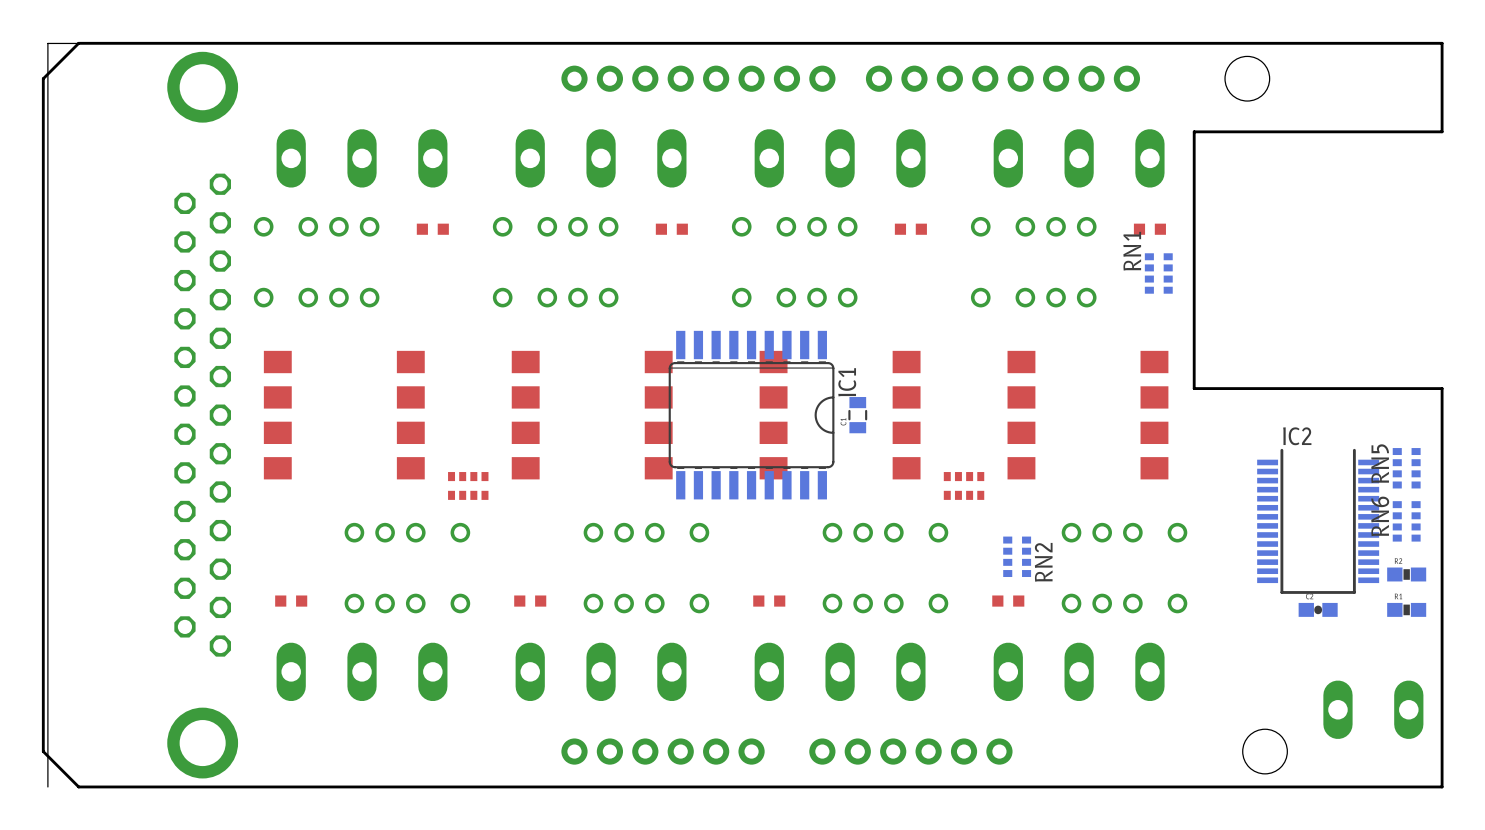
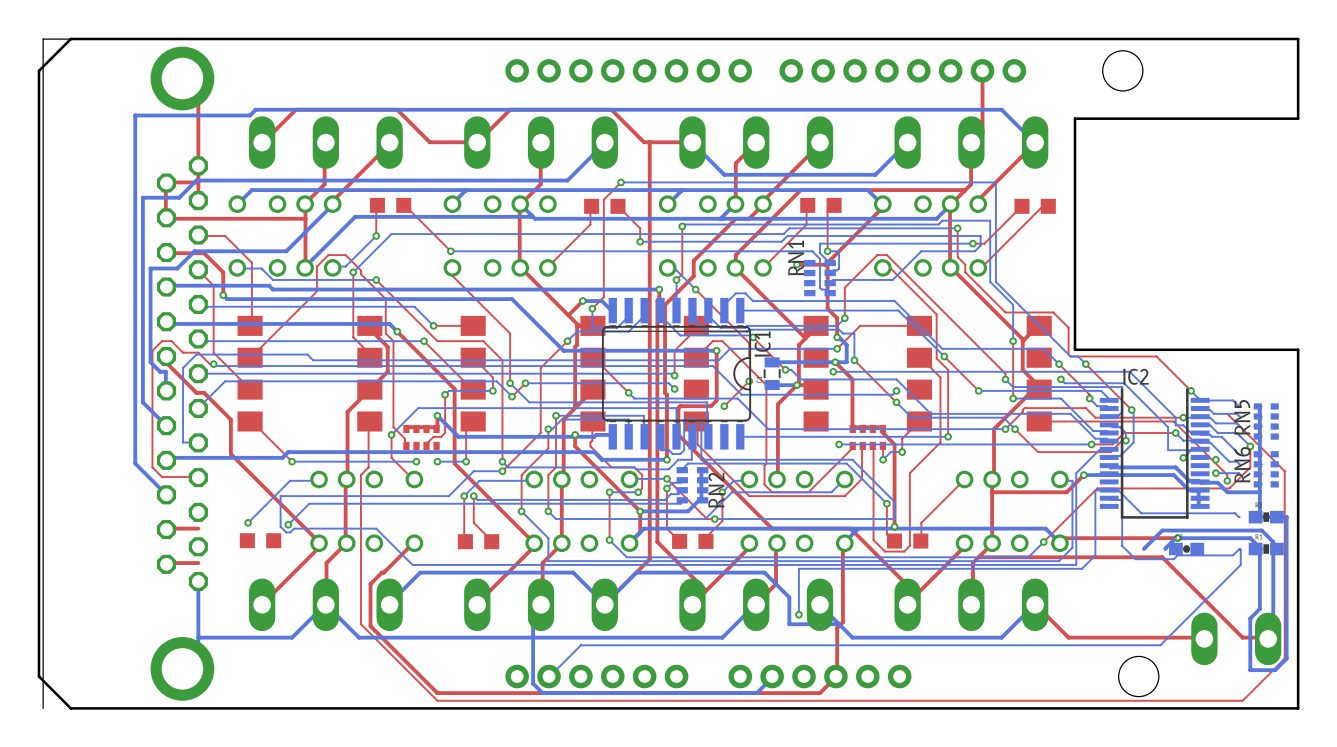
top track: none -> (982, 70) (982, 132) (971, 142) (971, 184) (950, 205) (950, 266) (1023, 340)
top track: none -> (182, 78) (198, 94) (198, 200)
top track: none -> (325, 142) (324, 184) (305, 204) (305, 267)
top track: none -> (389, 142) (334, 199) (332, 204)
top track: none -> (541, 142) (540, 184) (519, 205) (519, 266) (578, 325) (592, 325)
bottom track: none -> (604, 142) (567, 180) (196, 180) (179, 197) (142, 197) (142, 402) (166, 425)
top track: none -> (649, 142) (649, 559) (604, 604)
top track: none -> (692, 142) (644, 142) (611, 109) (510, 109) (477, 142) (429, 142) (397, 109) (295, 109) (262, 142)
top track: none -> (756, 142) (735, 163) (735, 204)
top track: none -> (819, 142) (764, 199) (764, 203) (749, 218) (735, 218) (693, 260) (693, 276) (665, 304) (666, 459)
bottom track: none -> (907, 142) (875, 174) (724, 174) (692, 142)
top track: none -> (1035, 142) (978, 199) (978, 204)
bottom track: none -> (1035, 142) (1001, 109) (255, 109) (250, 115) (135, 115) (135, 463) (166, 494)
top track: none -> (198, 182) (166, 183) (166, 217) (305, 218)
top track: none -> (621, 182) (603, 199) (603, 297) (592, 308)
bottom track: none -> (621, 182) (995, 182) (995, 281) (1070, 356) (1078, 356) (1085, 364)
via: none -> (621, 182)
bottom track: none -> (465, 191) (251, 190) (237, 204)
bottom track: none -> (681, 191) (466, 190) (452, 204)
top track: none -> (964, 191) (800, 190) (735, 255) (735, 267) (805, 338)
part footprint: [416, 223, 449, 235] -> [369, 197, 412, 213]
part footprint: [655, 223, 688, 235] -> [584, 198, 626, 214]
part footprint: [894, 223, 927, 235] -> [800, 197, 842, 213]
part footprint: [1133, 223, 1166, 235] -> [1014, 198, 1056, 214]
bottom track: none -> (332, 204) (286, 251) (194, 251) (177, 268) (150, 268) (150, 362) (160, 371) (165, 371) (166, 390)
bottom track: none -> (735, 204) (720, 218) (534, 218) (520, 204)
top track: none -> (882, 204) (881, 209) (825, 264) (797, 264)
bottom track: none -> (882, 204) (867, 190) (682, 190) (667, 204)
bottom track: none -> (950, 204) (936, 218) (721, 217)
top track: none -> (377, 205) (376, 235)
top track: none -> (403, 205) (450, 251)
top track: none -> (807, 205) (806, 224) (763, 267)
top track: none -> (834, 205) (827, 211) (827, 251)
top track: none -> (591, 206) (590, 224) (547, 267)
top track: none -> (617, 206) (640, 228) (640, 241)
top track: none -> (1021, 206) (984, 243) (972, 243)
top track: none -> (1048, 206) (1041, 207) (982, 266) (978, 267)
bottom track: none -> (532, 215) (355, 216) (305, 267)
top track: none -> (682, 226) (682, 274) (676, 279)
bottom track: none -> (682, 226) (684, 224) (938, 224) (942, 220) (990, 220) (990, 281) (1013, 304) (1013, 341)
via: none -> (682, 226)
top track: none -> (957, 228) (957, 257) (965, 264) (965, 272) (1005, 312) (1053, 312) (1068, 327) (1068, 354) (1070, 356) (1156, 356) (1191, 390)
bottom track: none -> (957, 228) (789, 228) (783, 234) (391, 234) (353, 272)
via: none -> (957, 228)
RN1 footprint: [1144, 253, 1173, 294] -> [804, 259, 836, 297]
top track: none -> (198, 235) (225, 235) (251, 262) (251, 325) (250, 325)
bottom track: none -> (376, 235) (345, 266) (332, 267)
via: none -> (376, 235)
bottom track: none -> (640, 241) (781, 241) (787, 235) (980, 235) (980, 245) (974, 251) (921, 251) (892, 279) (833, 279) (830, 283)
via: none -> (640, 241)
bottom track: none -> (972, 243) (819, 243) (819, 253) (830, 263)
via: none -> (972, 243)
bottom track: none -> (450, 251) (812, 251) (819, 258) (819, 287) (827, 289) (830, 293)
via: none -> (450, 251)
bottom track: none -> (827, 251) (839, 251) (839, 268) (830, 273)
via: none -> (827, 251)
top track: none -> (166, 252) (204, 253) (223, 272) (223, 295)
top track: none -> (826, 263) (827, 308) (837, 318) (837, 337)
via: none -> (797, 264)
bottom track: none -> (237, 267) (261, 268) (272, 279) (376, 279)
top track: none -> (452, 267) (452, 276) (510, 333) (510, 383)
bottom track: none -> (667, 267) (674, 268) (695, 289)
top track: none -> (882, 267) (890, 268) (936, 314) (936, 358) (948, 369) (948, 436)
top track: none -> (198, 269) (213, 285) (213, 352) (250, 389)
top track: none -> (353, 272) (353, 337) (368, 352) (369, 357)
via: none -> (353, 272)
top track: none -> (376, 279) (437, 341) (483, 341) (502, 360) (502, 461)
via: none -> (376, 279)
bottom track: none -> (676, 279) (676, 310)
via: none -> (676, 279)
bottom track: none -> (166, 286) (269, 285) (272, 289) (659, 289)
top track: none -> (659, 289) (659, 299) (657, 301) (657, 542) (705, 589) (692, 604) (749, 547) (749, 543)
via: none -> (659, 289)
top track: none -> (695, 289) (749, 343) (749, 358)
via: none -> (695, 289)
bottom track: none -> (223, 295) (227, 299) (512, 299) (563, 350) (716, 350)
via: none -> (223, 295)
top track: none -> (582, 301) (568, 315)
bottom track: none -> (582, 301) (601, 301) (612, 310)
via: none -> (582, 301)
bottom track: none -> (198, 304) (200, 306) (414, 306) (433, 325)
bottom track: none -> (592, 308) (592, 327) (617, 327) (628, 316) (628, 310)
via: none -> (592, 308)
bottom track: none -> (644, 310) (644, 316) (628, 331) (577, 331) (567, 341)
bottom track: none -> (660, 310) (661, 316) (680, 335) (751, 335) (753, 337)
bottom track: none -> (692, 310) (693, 318) (707, 331) (839, 329) (842, 333) (854, 333) (854, 360)
bottom track: none -> (708, 310) (709, 316) (720, 327) (837, 325) (844, 318)
bottom track: none -> (724, 310) (724, 304) (735, 293) (745, 293) (753, 301) (894, 301) (942, 348) (1043, 348) (1059, 364)
bottom track: none -> (740, 310) (898, 310) (944, 356)
top track: none -> (844, 318) (844, 287) (877, 255) (886, 255) (1005, 373) (1005, 379)
via: none -> (844, 318)
bottom track: none -> (166, 321) (169, 323) (389, 323) (397, 331)
top track: none -> (578, 324) (577, 345) (575, 346) (576, 407)
top track: none -> (369, 325) (370, 329) (387, 346) (387, 371) (347, 411) (346, 543) (326, 563) (325, 604)
via: none -> (433, 325)
top track: none -> (473, 325) (433, 325)
top track: none -> (696, 325) (695, 329) (674, 350) (674, 375)
top track: none -> (816, 325) (798, 345) (798, 385)
top track: none -> (919, 325) (860, 325) (837, 348)
top track: none -> (1039, 325) (1022, 341) (1022, 369) (1038, 385)
top track: none -> (397, 331) (454, 388) (454, 463) (534, 543) (533, 547) (477, 604)
via: none -> (397, 331)
top track: none -> (753, 337) (785, 369)
via: none -> (753, 337)
bottom track: none -> (837, 337) (846, 345) (846, 362) (772, 362)
via: none -> (837, 337)
bottom track: none -> (198, 338) (200, 341) (424, 341)
top track: none -> (424, 341) (473, 389)
via: none -> (424, 341)
top track: none -> (567, 341) (540, 367) (540, 432) (502, 471)
via: none -> (567, 341)
top track: none -> (1013, 341) (1013, 398)
via: none -> (1013, 341)
bottom track: none -> (837, 348) (730, 348) (718, 360) (313, 360) (307, 354) (196, 354) (183, 367) (183, 442) (198, 442)
via: none -> (837, 348)
top track: none -> (716, 350) (716, 400) (710, 406) (680, 406) (678, 408) (678, 434) (772, 528) (850, 528) (915, 593) (907, 604) (963, 547) (964, 543)
via: none -> (716, 350)
top track: none -> (166, 356) (167, 364) (196, 392) (204, 392) (230, 419) (230, 454) (318, 542) (318, 547) (262, 604)
top track: none -> (944, 356) (978, 390)
via: none -> (944, 356)
top track: none -> (250, 357) (316, 291) (316, 266) (328, 255) (345, 255) (360, 270) (360, 274) (385, 299) (385, 333) (393, 341) (393, 427) (404, 438) (406, 447)
top track: none -> (473, 357) (492, 377) (492, 390)
top track: none -> (592, 357) (628, 392)
top track: none -> (696, 357) (712, 341) (722, 341) (766, 385) (766, 463) (764, 465) (764, 484) (772, 492) (808, 492) (852, 447)
top track: none -> (919, 357) (940, 377) (940, 442) (909, 473) (909, 545) (904, 551) (885, 551) (873, 540) (872, 447)
top track: none -> (854, 360) (896, 402)
via: none -> (854, 360)
top track: none -> (835, 362) (852, 379) (852, 427) (883, 427) (883, 432) (894, 444) (894, 526)
via: none -> (835, 362)
top track: none -> (213, 364) (209, 364) (198, 352) (183, 352) (171, 341) (162, 341) (152, 350) (152, 467) (162, 476) (198, 477)
bottom track: none -> (213, 364) (215, 366) (712, 366) (741, 394) (892, 394) (896, 390)
via: none -> (213, 364)
top track: none -> (1059, 364) (1089, 394) (1089, 398)
via: none -> (1059, 364)
top track: none -> (1085, 364) (1131, 410)
via: none -> (1085, 364)
bottom track: none -> (785, 369) (791, 369) (800, 379) (896, 379) (930, 413) (1070, 413) (1095, 438) (1106, 438) (1109, 441)
via: none -> (785, 369)
bottom track: none -> (833, 371) (1129, 371) (1175, 417) (1175, 425) (1183, 425) (1191, 432) (1221, 436) (1240, 454)
via: none -> (833, 371)
bottom track: none -> (198, 373) (672, 373) (674, 375)
via: none -> (674, 375)
bottom track: none -> (1005, 379) (1013, 387) (1122, 387) (1122, 411) (1118, 415) (1109, 416)
via: none -> (1005, 379)
bottom track: none -> (1060, 379) (1064, 383) (1124, 383) (1168, 427) (1168, 450) (1200, 449) (1191, 450) (1183, 457)
via: none -> (1060, 379)
top track: none -> (749, 381) (724, 406)
via: none -> (749, 381)
bottom track: none -> (510, 383) (529, 402) (707, 402) (708, 436)
via: none -> (510, 383)
top track: none -> (525, 383) (512, 396)
bottom track: none -> (525, 383) (668, 383) (674, 388)
via: none -> (525, 383)
bottom track: none -> (797, 385) (772, 385)
via: none -> (797, 385)
top track: none -> (1038, 385) (994, 429) (992, 543) (972, 563) (972, 603) (971, 604)
top track: none -> (592, 389) (563, 419) (561, 543) (542, 563) (542, 603) (541, 604)
via: none -> (674, 388)
top track: none -> (816, 389) (810, 385) (797, 385) (777, 404) (776, 479)
bottom track: none -> (492, 390) (448, 390) (445, 394)
via: none -> (492, 390)
via: none -> (896, 390)
bottom track: none -> (978, 390) (1101, 390) (1109, 400)
via: none -> (978, 390)
bottom track: none -> (1191, 390) (1200, 400) (1233, 400) (1240, 406)
via: none -> (1191, 390)
bottom track: none -> (628, 392) (634, 398) (737, 398) (768, 429) (1005, 429)
via: none -> (628, 392)
top track: none -> (445, 394) (445, 432) (441, 436) (433, 436) (427, 442) (426, 447)
via: none -> (445, 394)
bottom track: none -> (512, 396) (496, 381) (225, 381) (198, 408)
via: none -> (512, 396)
bottom track: none -> (1013, 398) (1060, 398) (1093, 431) (1106, 431) (1109, 432)
via: none -> (1013, 398)
bottom track: none -> (1089, 398) (1097, 406) (1106, 406) (1109, 408)
via: none -> (1089, 398)
bottom track: none -> (896, 402) (911, 417) (1003, 417) (1015, 429)
via: none -> (896, 402)
via: none -> (724, 406)
bottom track: none -> (1260, 406) (1259, 517) (1286, 517) (1286, 658) (1275, 670) (1250, 670) (1250, 618) (1259, 608) (1260, 549) (1250, 538) (1175, 538) (1165, 549)
bottom track: none -> (1200, 408) (1210, 410) (1213, 413) (1236, 413) (1240, 416)
bottom track: none -> (1131, 410) (1133, 410) (1133, 442) (1120, 455) (1109, 457)
via: none -> (1131, 410)
top track: none -> (1227, 413) (1284, 471) (1284, 658) (1242, 700) (437, 700) (360, 624) (360, 475) (368, 467) (369, 421)
top track: none -> (437, 415) (437, 427) (406, 427)
bottom track: none -> (437, 415) (458, 436) (594, 436) (596, 434) (609, 434) (612, 436)
via: none -> (437, 415)
top track: none -> (556, 415) (556, 467) (548, 475) (548, 511)
bottom track: none -> (556, 415) (644, 415) (644, 436)
via: none -> (556, 415)
top track: none -> (1183, 417) (1095, 417) (1085, 408) (1024, 408) (1005, 429)
bottom track: none -> (1183, 417) (1210, 417) (1215, 423) (1236, 423) (1240, 426)
via: none -> (1183, 417)
top track: none -> (250, 421) (292, 461)
top track: none -> (473, 421) (466, 427) (466, 461)
top track: none -> (592, 421) (590, 446) (611, 467) (634, 467) (642, 475) (642, 488) (638, 492)
top track: none -> (696, 421) (697, 444) (749, 496) (844, 496) (862, 478) (862, 447)
top track: none -> (919, 421) (902, 438) (902, 452)
top track: none -> (1039, 421) (1173, 421) (1227, 475) (1227, 480)
bottom track: none -> (1109, 424) (1112, 427) (1120, 427) (1125, 432) (1125, 440)
bottom track: none -> (1200, 424) (1210, 425) (1217, 432) (1236, 432) (1250, 446)
top track: none -> (548, 429) (548, 448) (521, 475) (521, 511)
bottom track: none -> (548, 429) (552, 429) (561, 419) (628, 419) (628, 436)
via: none -> (548, 429)
via: none -> (1005, 429)
top track: none -> (1015, 429) (1038, 452) (1110, 452) (1122, 440) (1125, 440)
via: none -> (1015, 429)
top track: none -> (1175, 432) (1124, 432) (1112, 444) (1091, 444)
bottom track: none -> (1175, 432) (1183, 440) (1210, 442) (1229, 461) (1236, 461) (1240, 464)
via: none -> (1175, 432)
top track: none -> (391, 434) (391, 457) (414, 479)
bottom track: none -> (391, 434) (418, 408) (676, 408) (676, 436)
via: none -> (391, 434)
top track: none -> (575, 434) (575, 446) (640, 511) (640, 532) (629, 543)
via: none -> (575, 434)
bottom track: none -> (660, 436) (661, 450) (668, 450) (672, 454) (680, 454) (684, 450) (684, 419) (697, 419) (701, 423) (701, 459) (852, 459) (894, 501) (894, 519) (714, 519)
bottom track: none -> (692, 436) (691, 459) (678, 459) (668, 469) (636, 469) (634, 467) (508, 467) (502, 461)
bottom track: none -> (948, 436) (740, 436)
via: none -> (948, 436)
via: none -> (1125, 440)
via: none -> (839, 444)
bottom track: none -> (1091, 444) (839, 444)
via: none -> (1091, 444)
top track: none -> (1250, 446) (1250, 467) (1229, 488) (1097, 488) (1043, 542)
via: none -> (1250, 446)
top track: none -> (882, 447) (883, 459)
bottom track: none -> (1109, 449) (1099, 450) (1076, 473) (1076, 564) (412, 564) (376, 528) (294, 528) (290, 532) (286, 532) (280, 526) (280, 496) (448, 496) (473, 471) (502, 471)
bottom track: none -> (902, 452) (890, 452) (883, 459)
via: none -> (902, 452)
via: none -> (1183, 457)
bottom track: none -> (666, 459) (601, 459) (594, 452) (288, 452) (282, 457) (169, 457) (166, 460)
via: none -> (666, 459)
via: none -> (883, 459)
via: none -> (1215, 459)
via: none -> (292, 461)
bottom track: none -> (416, 461) (292, 461)
via: none -> (416, 461)
via: none -> (437, 461)
bottom track: none -> (466, 461) (437, 461)
via: none -> (466, 461)
via: none -> (502, 461)
bottom track: none -> (1109, 465) (1110, 467) (1175, 467) (1189, 480) (1217, 482) (1227, 492) (1259, 492)
IC2 position: (1318, 521) -> (1154, 453)
bottom track: none -> (682, 470) (688, 463) (846, 463) (886, 503)
bottom track: none -> (702, 470) (702, 500) (699, 499) (688, 511) (640, 511)
via: none -> (502, 471)
bottom track: none -> (1215, 473) (1240, 474)
via: none -> (1215, 473)
top track: none -> (1083, 475) (1066, 492) (992, 492)
bottom track: none -> (1083, 475) (1173, 475) (1189, 490) (1200, 490) (1198, 490) (1200, 506)
via: none -> (1083, 475)
top track: none -> (666, 478) (707, 519) (714, 519)
bottom track: none -> (666, 478) (629, 479)
via: none -> (666, 478)
bottom track: none -> (319, 479) (290, 480) (248, 522)
bottom track: none -> (534, 479) (479, 480) (464, 496)
bottom track: none -> (749, 479) (733, 480) (722, 492)
bottom track: none -> (844, 479) (831, 492) (731, 492) (705, 519) (556, 519) (548, 511)
top track: none -> (964, 479) (921, 522) (920, 541)
bottom track: none -> (1059, 479) (1072, 480) (1072, 547) (1059, 561) (548, 561) (548, 538) (521, 511)
bottom track: none -> (682, 480) (680, 482) (672, 482) (666, 488)
via: none -> (1227, 480)
RN2 footprint: [1003, 536, 1032, 578] -> [676, 467, 709, 504]
top track: none -> (666, 488) (666, 528) (679, 541)
via: none -> (666, 488)
bottom track: none -> (682, 490) (678, 494) (670, 494) (665, 499) (477, 499) (473, 496)
top track: none -> (609, 492) (609, 540)
via: none -> (609, 492)
bottom track: none -> (638, 492) (609, 492)
via: none -> (638, 492)
top track: none -> (722, 492) (722, 520) (707, 536) (705, 541)
via: none -> (722, 492)
top track: none -> (464, 496) (465, 541)
via: none -> (464, 496)
top track: none -> (473, 496) (473, 522) (491, 541)
via: none -> (473, 496)
bottom track: none -> (1109, 498) (1122, 499) (1122, 545) (1135, 559) (1173, 559) (1177, 555) (1233, 555) (1240, 549) (1240, 564) (1160, 645) (580, 645) (549, 676)
bottom track: none -> (682, 500) (680, 503) (309, 503) (288, 524)
top track: none -> (886, 503) (886, 534) (894, 541)
via: none -> (886, 503)
via: none -> (521, 511)
via: none -> (548, 511)
via: none -> (640, 511)
bottom track: none -> (1239, 517) (1235, 513) (1141, 513) (1118, 490) (1095, 490) (1095, 555) (1082, 568) (798, 568) (798, 614)
via: none -> (714, 519)
via: none -> (248, 522)
via: none -> (288, 524)
via: none -> (894, 526)
top track: none -> (198, 528) (166, 529)
bottom track: none -> (857, 529) (644, 528) (629, 543)
part footprint: [275, 595, 308, 607] -> [239, 533, 282, 549]
part footprint: [514, 595, 547, 607] -> [457, 534, 500, 550]
part footprint: [753, 595, 786, 607] -> [672, 533, 714, 549]
part footprint: [992, 595, 1025, 607] -> [886, 533, 929, 549]
top track: none -> (1177, 538) (1064, 538) (1059, 543)
via: none -> (1177, 538)
bottom track: none -> (609, 540) (626, 557) (1028, 557) (1043, 542)
via: none -> (609, 540)
via: none -> (1043, 542)
top track: none -> (776, 543) (775, 584) (756, 604)
top track: none -> (844, 543) (842, 543) (842, 622) (837, 628) (837, 675) (819, 693) (437, 693) (370, 626) (370, 584) (414, 543)
bottom track: none -> (1059, 543) (1045, 528) (858, 528) (844, 543)
bottom track: none -> (1144, 549) (1162, 530) (1261, 530) (1273, 542) (1273, 637) (1268, 638)
top track: none -> (979, 556) (1162, 557) (1242, 637) (1268, 638)
top track: none -> (198, 563) (166, 564)
bottom track: none -> (198, 581) (198, 668) (182, 668)
bottom track: none -> (389, 604) (420, 572) (573, 572) (604, 604) (636, 572) (764, 572) (789, 597) (789, 624) (838, 623)
bottom track: none -> (541, 604) (533, 605) (533, 683) (542, 693) (756, 693) (772, 676)
bottom track: none -> (756, 604) (722, 637) (359, 637) (325, 604) (292, 637) (198, 637)
top track: none -> (1035, 604) (1068, 637) (1204, 638)
bottom track: none -> (1035, 604) (1001, 637) (852, 637) (819, 604)
via: none -> (798, 614)

